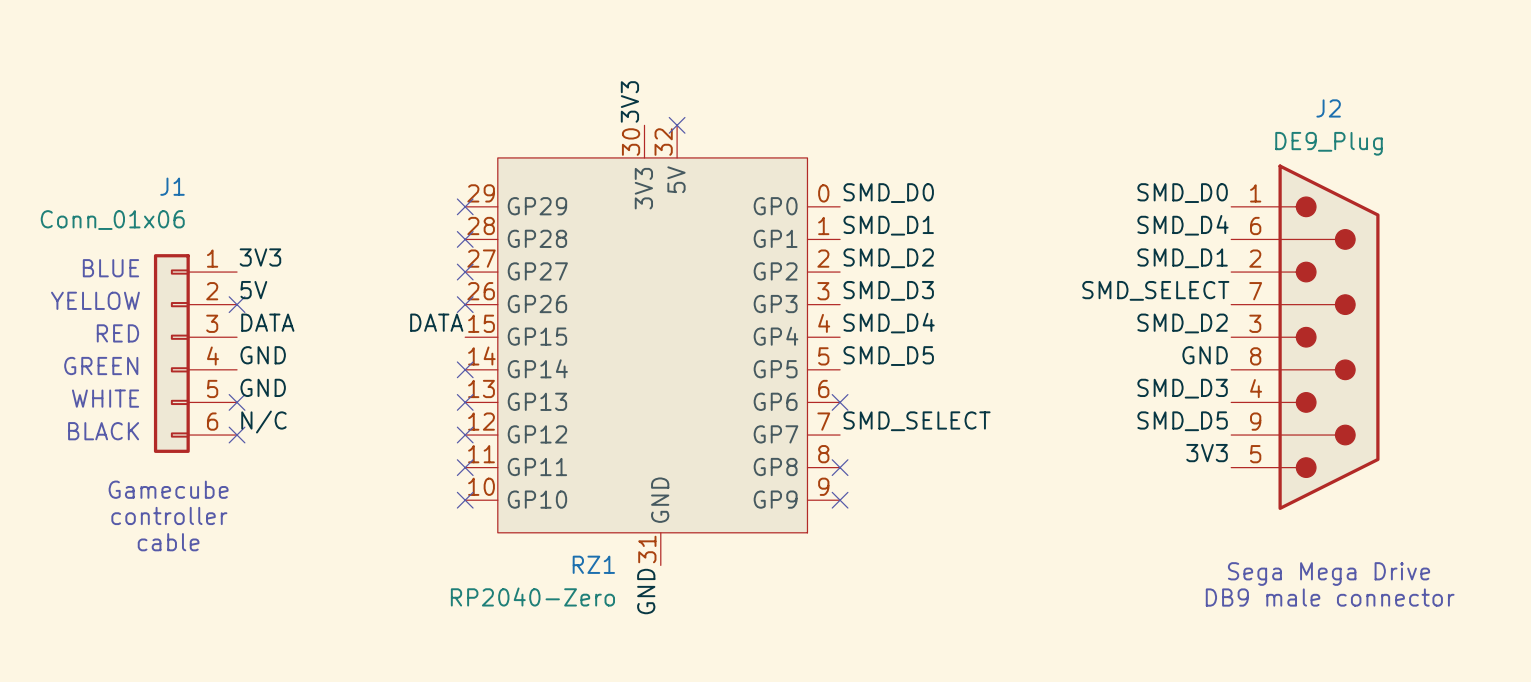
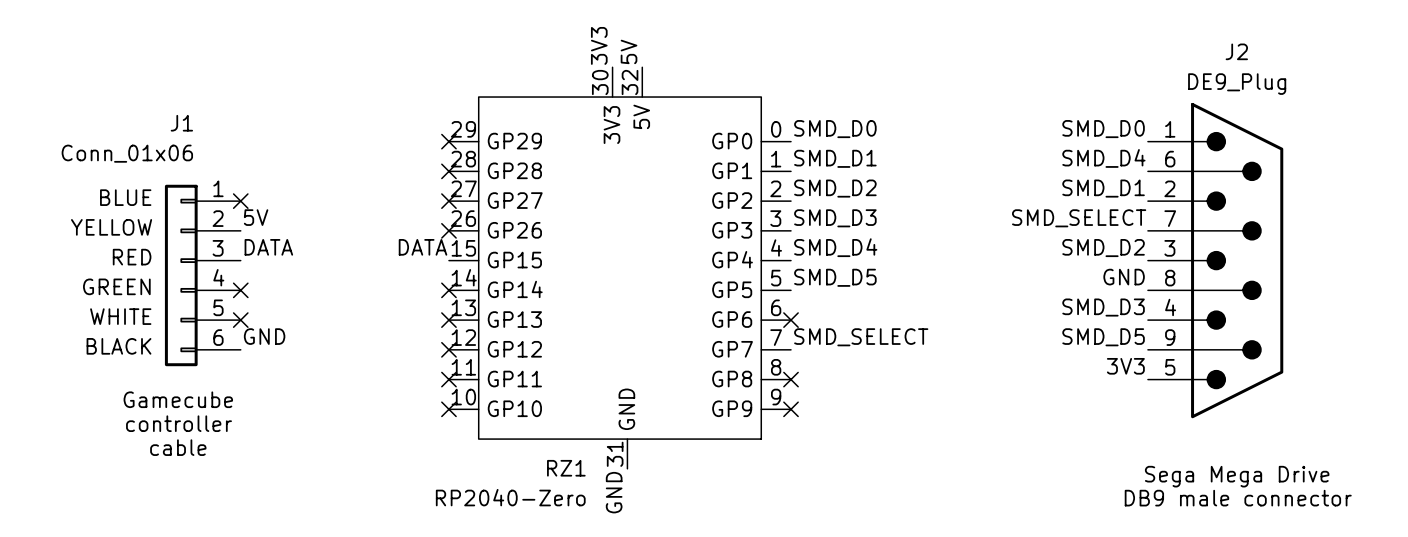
label: none -> 5V (629, 51)
no-connect mark: (677, 125) -> none
label: 3V3 (260, 257) -> none
no-connect mark: none -> (240, 201)
no-connect mark: (237, 304) -> none
label: GND (263, 355) -> none
no-connect mark: none -> (240, 290)
label: GND (263, 387) -> none
label: N/C (263, 422) -> GND (264, 336)
no-connect mark: (237, 435) -> none

